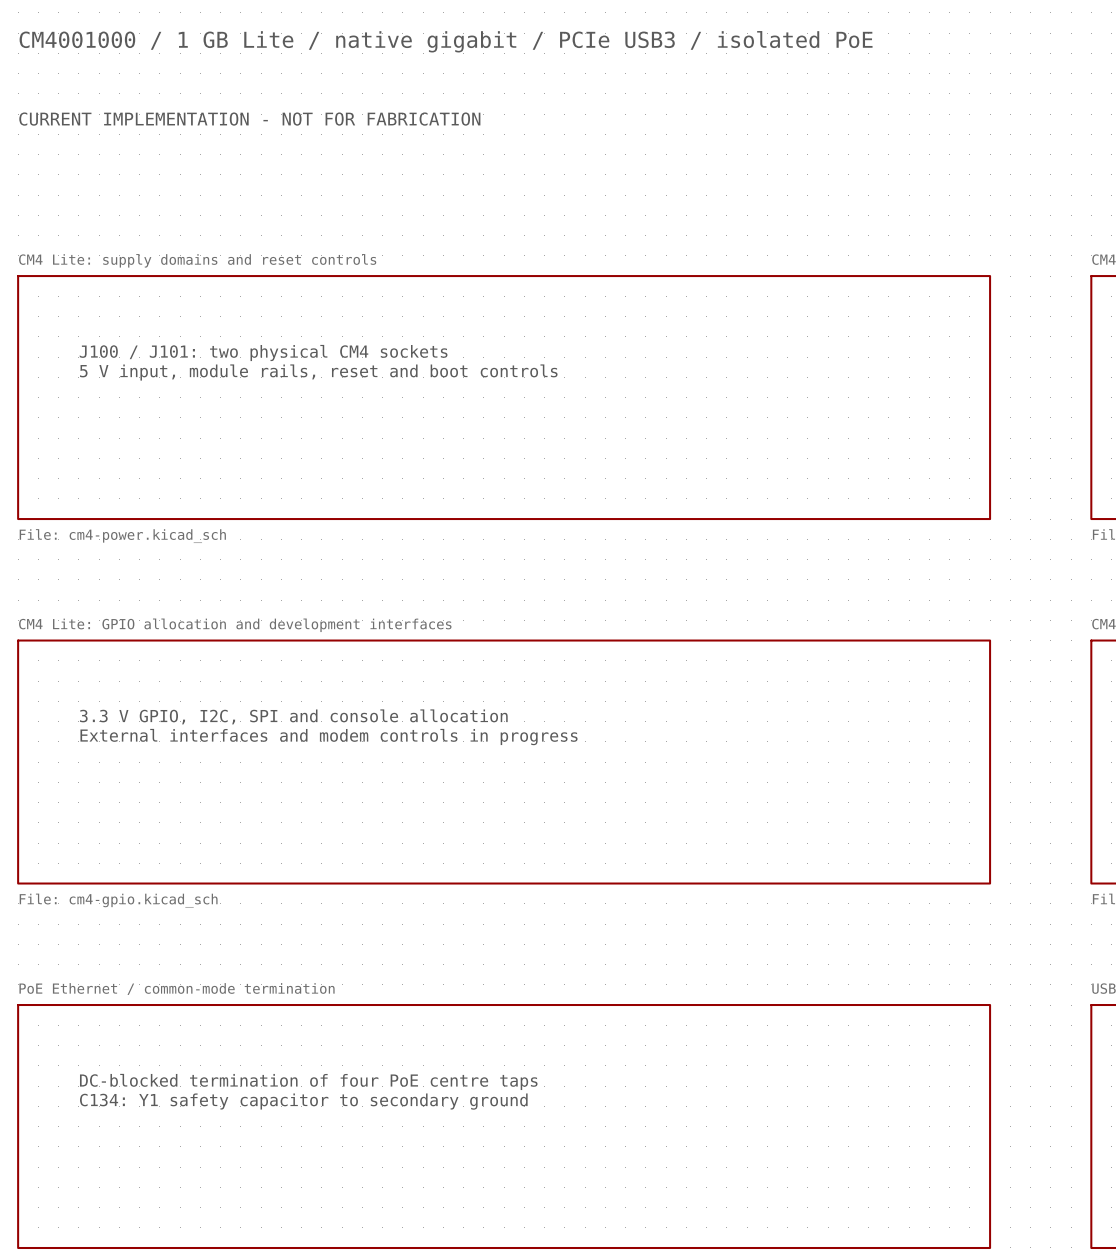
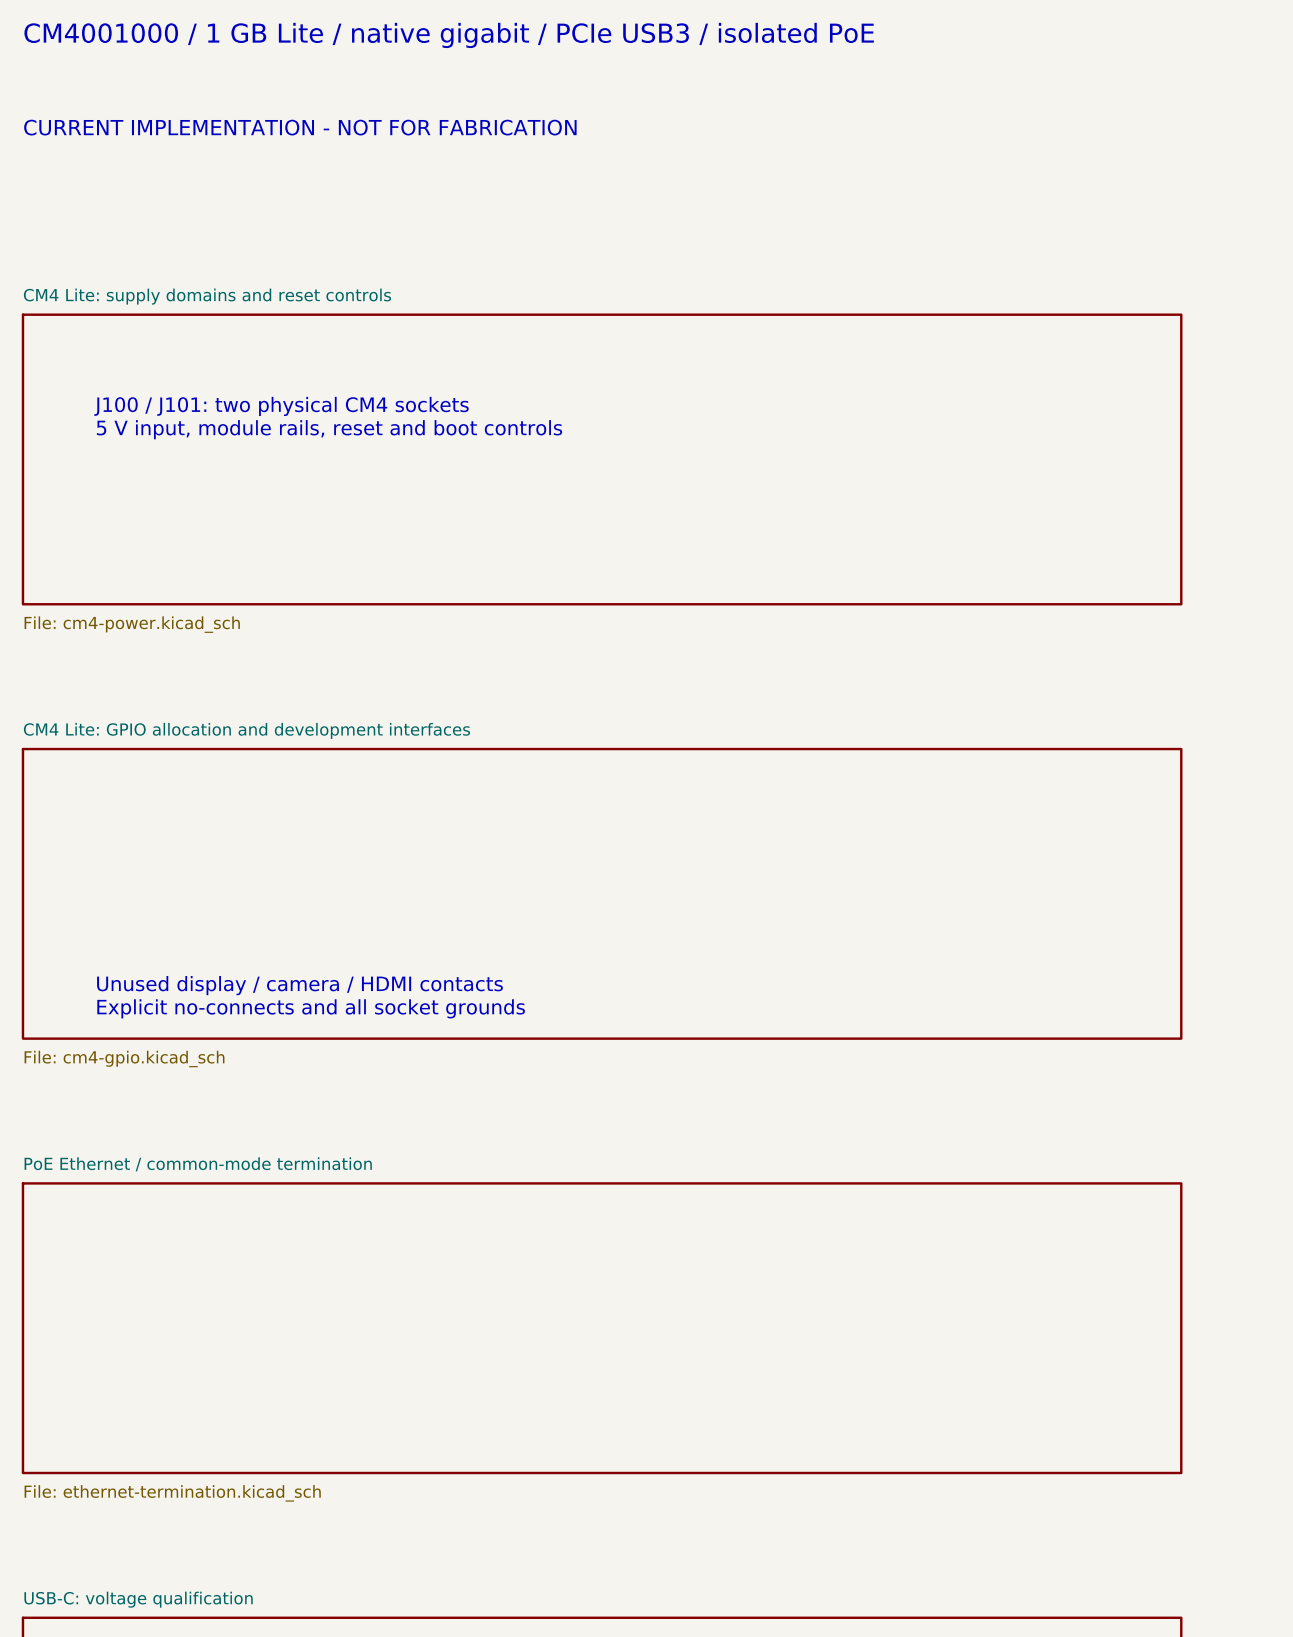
text: 3.3 V GPIO, I2C, SPI and console allocation (293, 716) -> none
text: External interfaces and modem controls in progress (329, 737) -> none
text: none -> Unused display / camera / HDMI contacts (299, 985)
text: none -> Explicit no-connects and all socket grounds (311, 1008)
text: DC-blocked termination of four PoE centre taps (308, 1081) -> none
text: C134: Y1 safety capacitor to secondary ground (303, 1101) -> none

